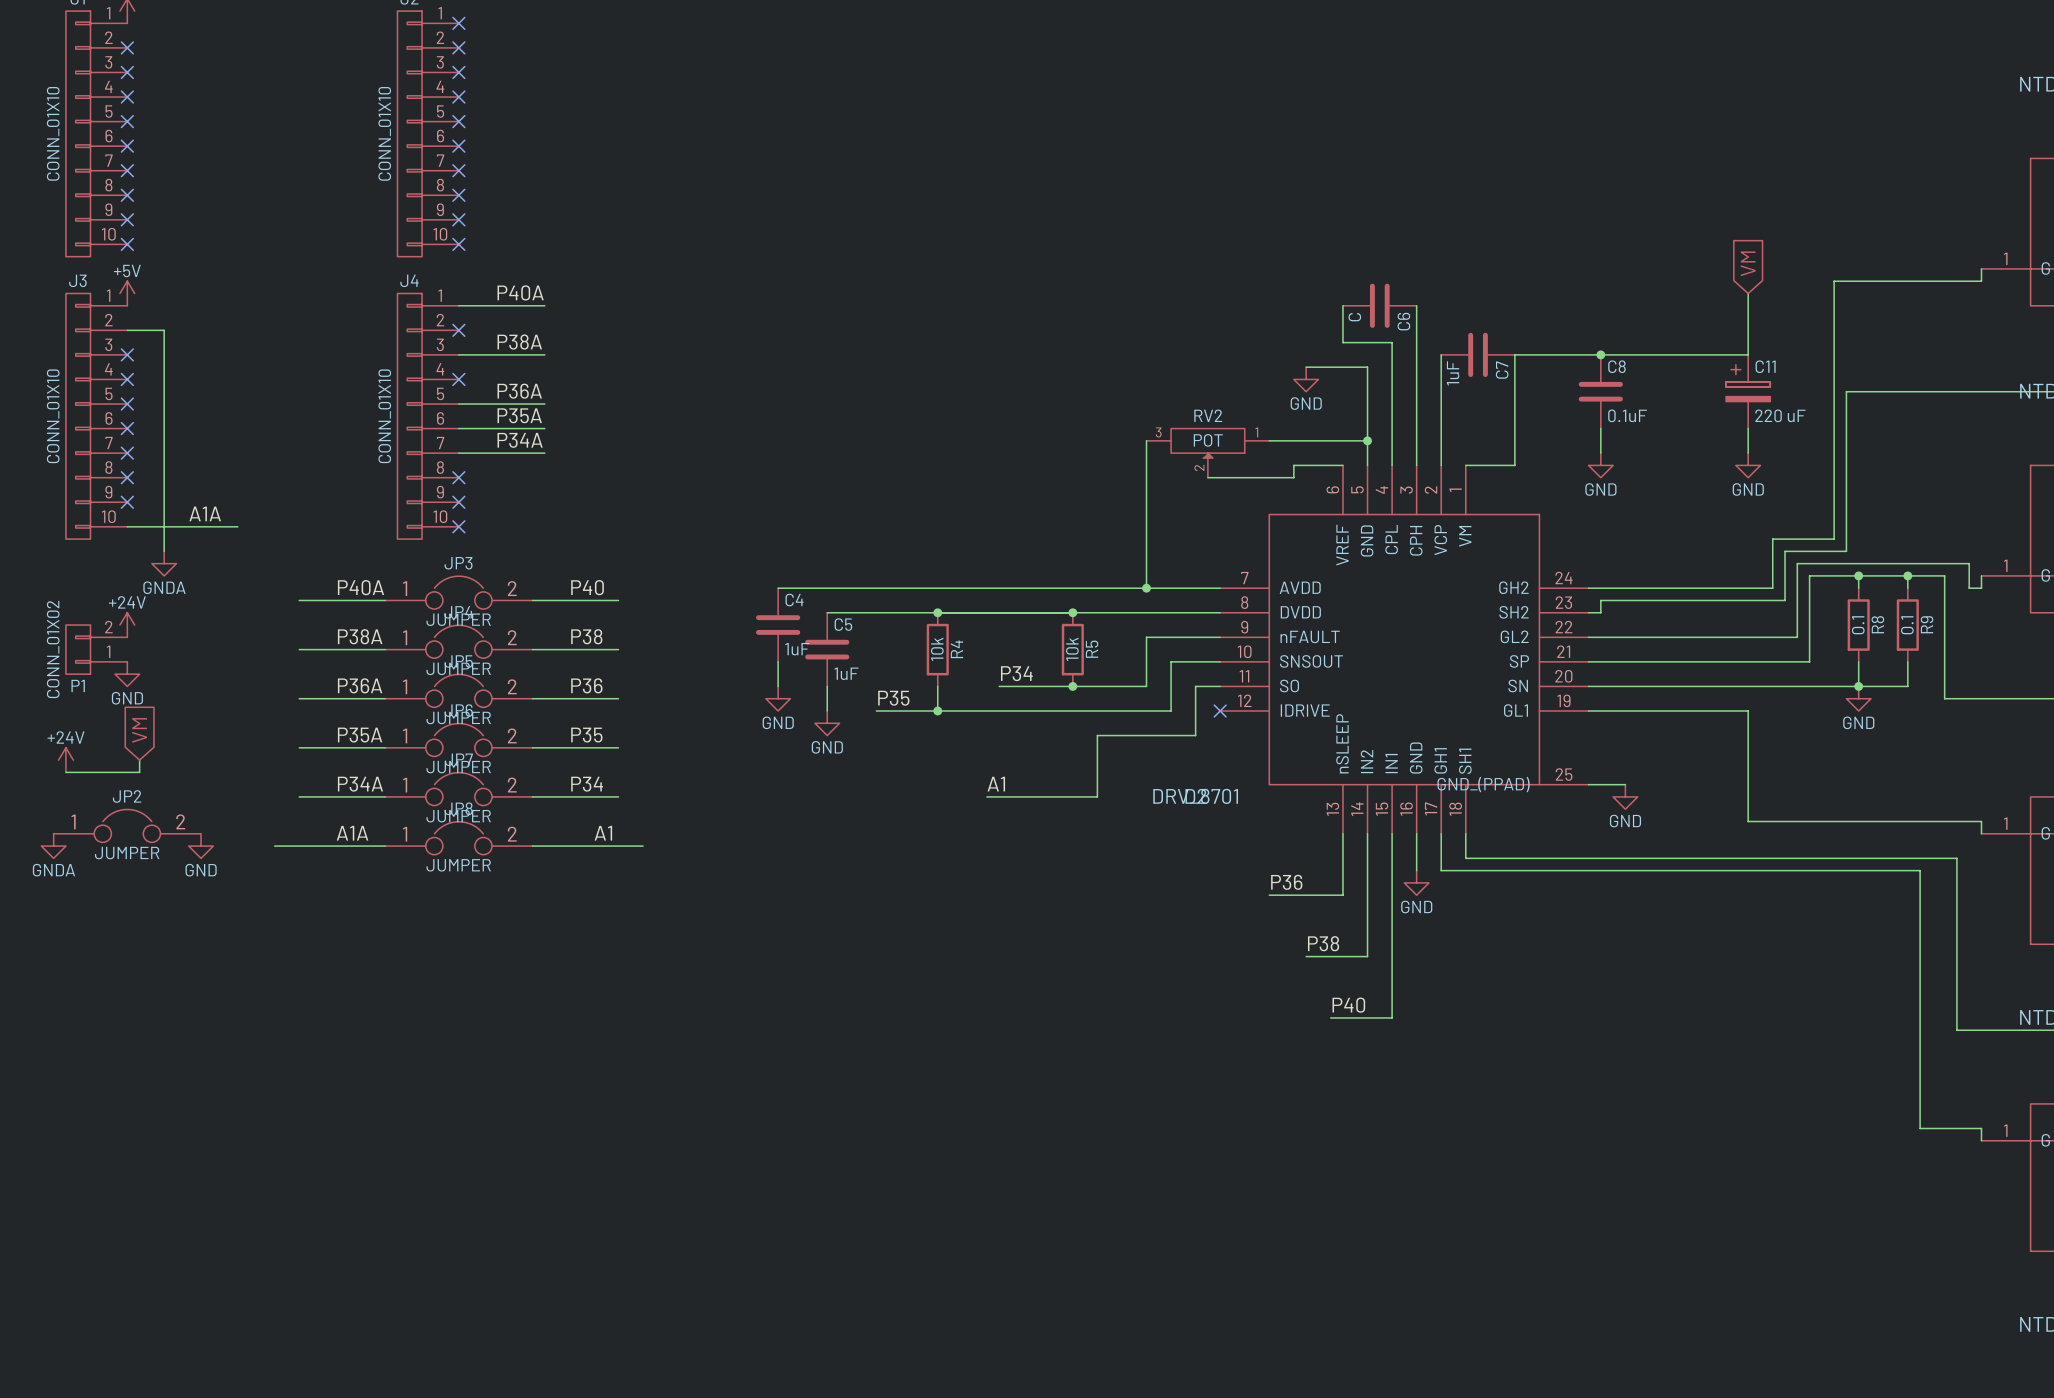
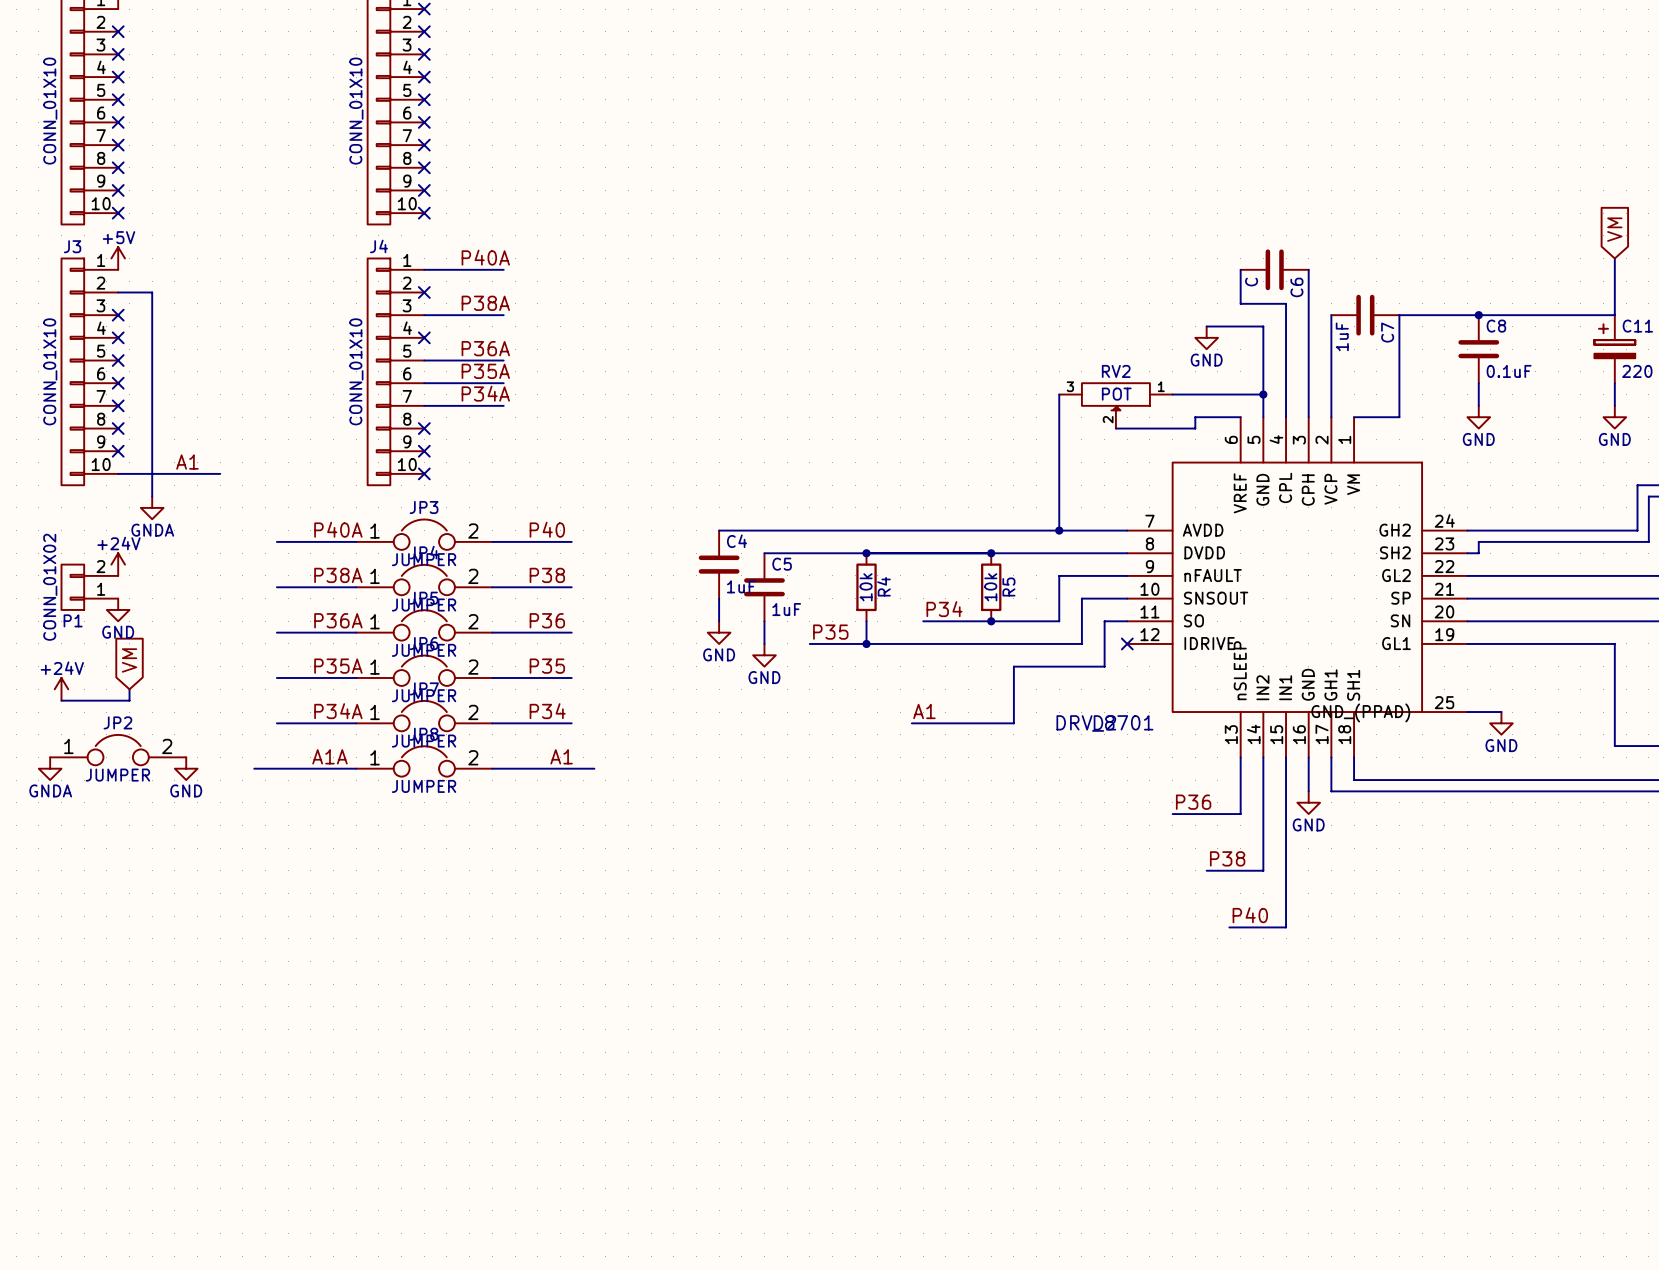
label: A1A (205, 513) -> A1 (187, 462)

